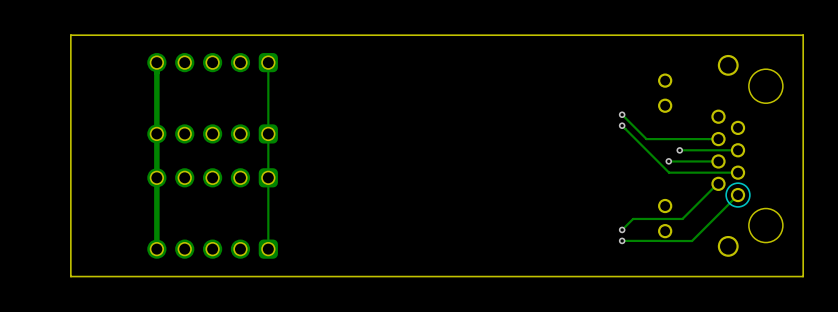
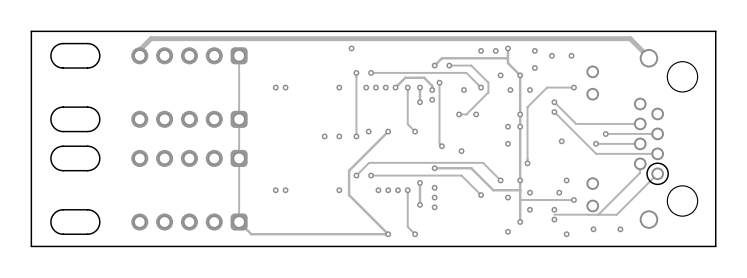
board edge: (70, 35) (70, 276) -> (63, 31) (31, 31) (31, 246) (63, 246)
board edge: none -> (87, 43) (57, 45) (51, 52) (52, 61) (61, 67) (93, 66) (98, 60) (99, 52) (95, 46) (87, 43)
via: none -> (351, 48)
track: none -> (507, 48) (507, 63) (520, 75) (520, 222)
via: none -> (507, 48)
via: none -> (481, 50)
via: none -> (495, 50)
via: none -> (534, 50)
track: (156, 62) (156, 249) -> (139, 55) (139, 50) (151, 38) (630, 38) (648, 58)
via: none -> (551, 55)
via: none -> (571, 55)
track: none -> (507, 58) (441, 58) (434, 65)
via: none -> (434, 65)
track: none -> (449, 65) (471, 65) (488, 82) (488, 92) (466, 114) (459, 114)
via: none -> (449, 65)
via: none -> (534, 68)
track: none -> (356, 72) (356, 136)
via: none -> (356, 72)
track: none -> (371, 72) (466, 72) (481, 87)
via: none -> (371, 72)
via: none -> (500, 75)
via: none -> (520, 75)
track: none -> (439, 82) (439, 143) (441, 146)
via: none -> (439, 82)
via: none -> (275, 87)
via: none -> (285, 87)
via: none -> (339, 87)
via: none -> (366, 87)
via: none -> (375, 87)
via: none -> (385, 87)
track: none -> (395, 87) (405, 77) (424, 77) (432, 85) (432, 90)
via: none -> (395, 87)
track: none -> (407, 87) (407, 124) (415, 131)
via: none -> (407, 87)
track: none -> (419, 87) (419, 102)
via: none -> (419, 87)
via: none -> (481, 87)
track: none -> (573, 87) (547, 87) (527, 107) (527, 163)
via: none -> (573, 87)
via: none -> (432, 90)
via: none -> (463, 90)
via: none -> (510, 90)
via: none -> (529, 90)
via: none -> (432, 99)
via: none -> (419, 102)
board edge: none -> (87, 107) (57, 108) (51, 116) (52, 125) (61, 131) (93, 129) (98, 124) (99, 116) (95, 109) (87, 107)
via: none -> (459, 114)
via: none -> (476, 114)
via: none -> (520, 114)
via: none -> (507, 126)
via: none -> (520, 126)
via: none -> (368, 131)
track: none -> (388, 131) (349, 170) (349, 195) (388, 234) (251, 234) (239, 222)
via: none -> (388, 131)
via: none -> (415, 131)
via: none -> (324, 136)
via: none -> (339, 136)
via: none -> (356, 136)
via: none -> (561, 141)
via: none -> (507, 143)
board edge: none -> (87, 146) (57, 147) (51, 155) (52, 164) (61, 170) (93, 169) (98, 163) (99, 155) (95, 148) (87, 146)
via: none -> (441, 146)
via: none -> (461, 151)
via: none -> (527, 163)
track: (718, 183) (682, 218) (633, 218) (622, 229) -> (640, 163) (639, 173) (598, 214)
track: none -> (434, 168) (471, 168) (493, 190) (520, 190)
via: none -> (434, 168)
track: none -> (356, 175) (369, 162) (483, 162) (500, 180)
via: none -> (356, 175)
track: none -> (371, 175) (461, 175) (481, 195)
via: none -> (371, 175)
via: none -> (500, 180)
via: none -> (520, 180)
via: none -> (566, 180)
track: none -> (419, 182) (419, 204)
via: none -> (419, 182)
via: none -> (434, 187)
via: none -> (275, 190)
via: none -> (285, 190)
via: none -> (339, 190)
via: none -> (378, 190)
via: none -> (388, 190)
via: none -> (397, 190)
track: none -> (407, 190) (407, 226) (415, 234)
via: none -> (407, 190)
via: none -> (529, 192)
via: none -> (559, 192)
via: none -> (481, 195)
via: none -> (434, 197)
via: none -> (507, 197)
track: none -> (573, 200) (520, 200)
via: none -> (573, 200)
via: none -> (419, 204)
via: (622, 229) -> none
via: none -> (434, 207)
board edge: none -> (87, 209) (57, 211) (51, 218) (52, 228) (61, 234) (93, 232) (98, 226) (99, 218) (95, 212) (87, 209)
via: none -> (529, 209)
via: none -> (554, 209)
via: (622, 240) -> none
via: none -> (554, 219)
via: none -> (520, 222)
via: none -> (593, 229)
via: none -> (620, 229)
via: none -> (507, 231)
via: none -> (388, 234)
via: none -> (415, 234)
via: none -> (566, 234)

